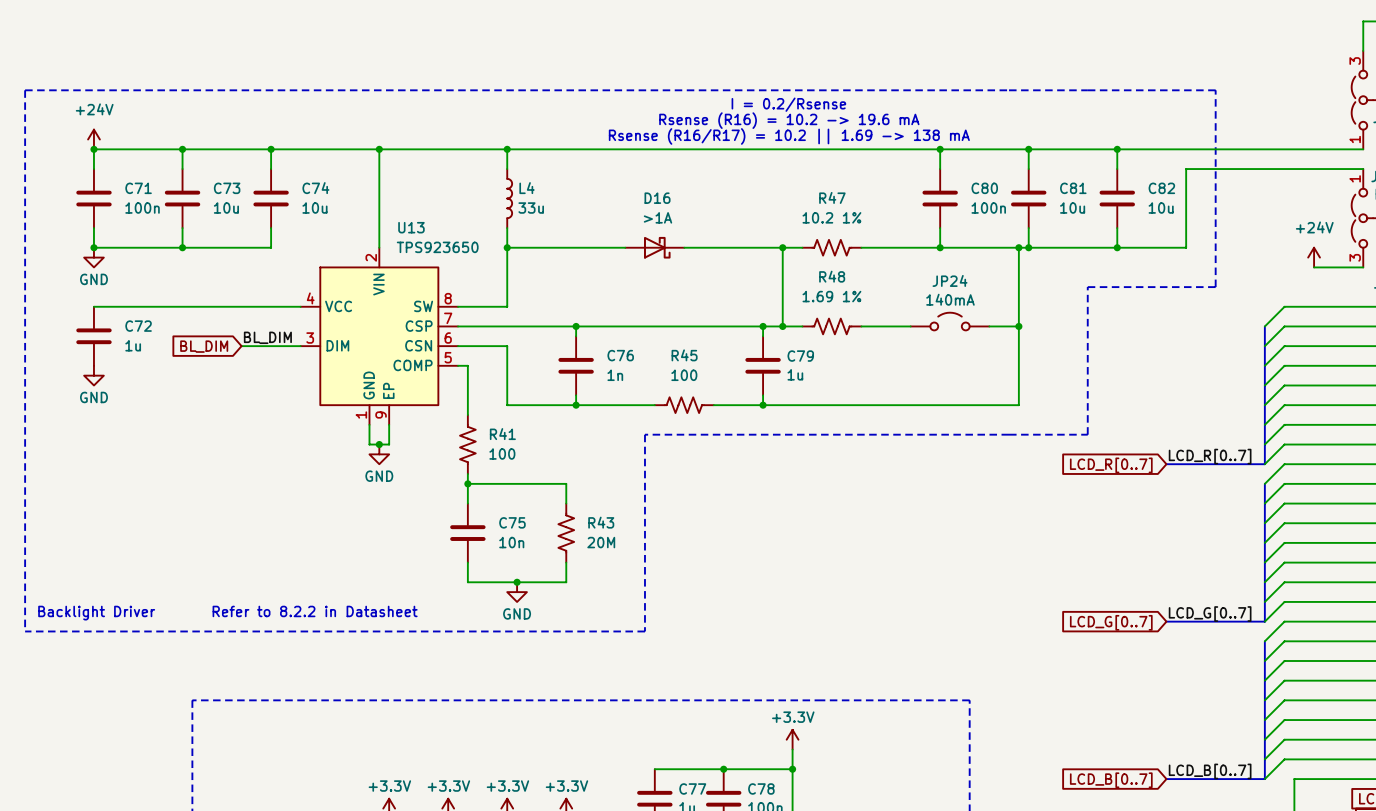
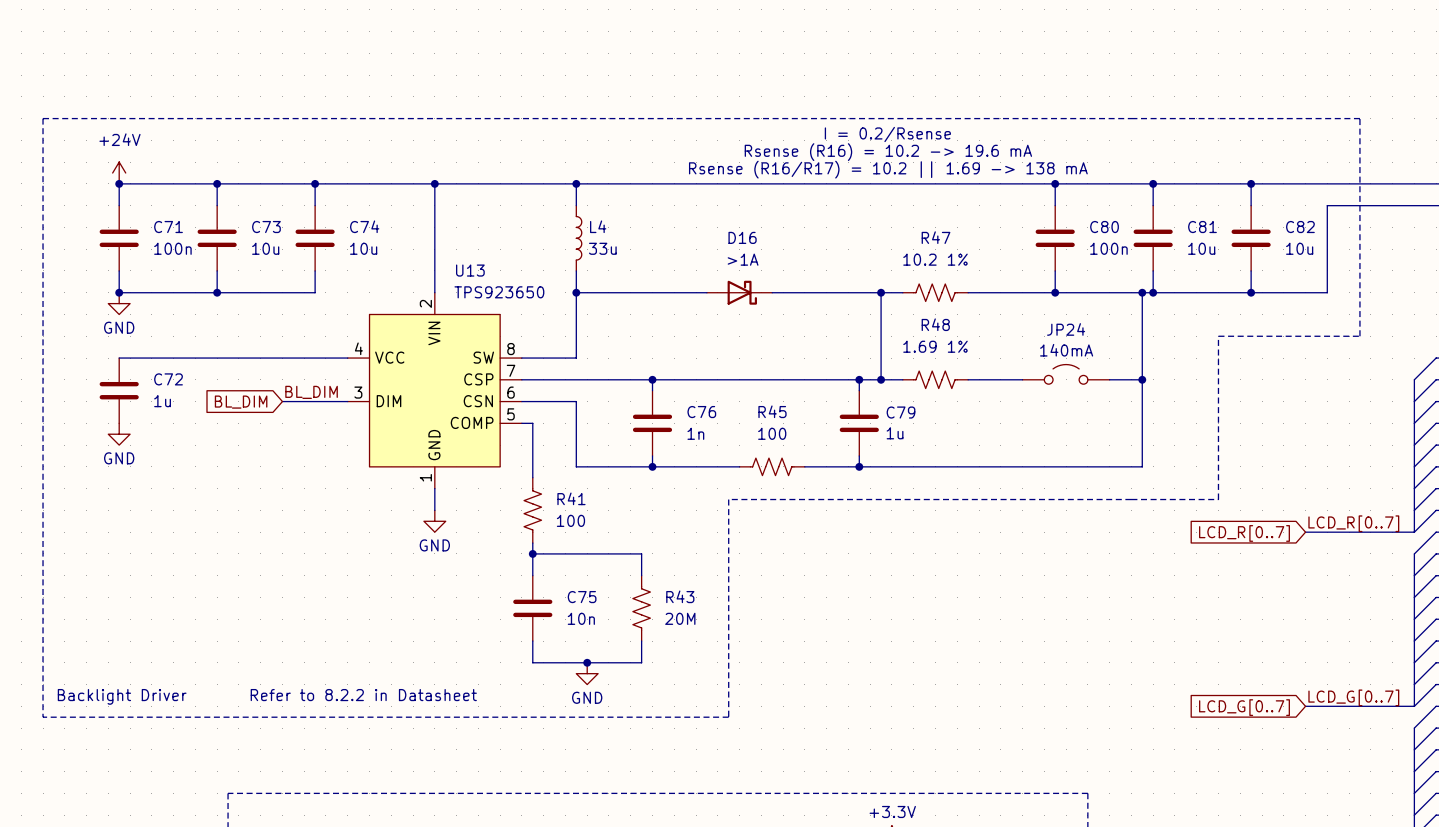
U13 symbol: [300, 247, 459, 425] -> [347, 292, 522, 489]
wire: (369, 424) (369, 444) (389, 444) (389, 424) -> none
wire: none -> (434, 488) (434, 510)
junction: (379, 444) -> none

